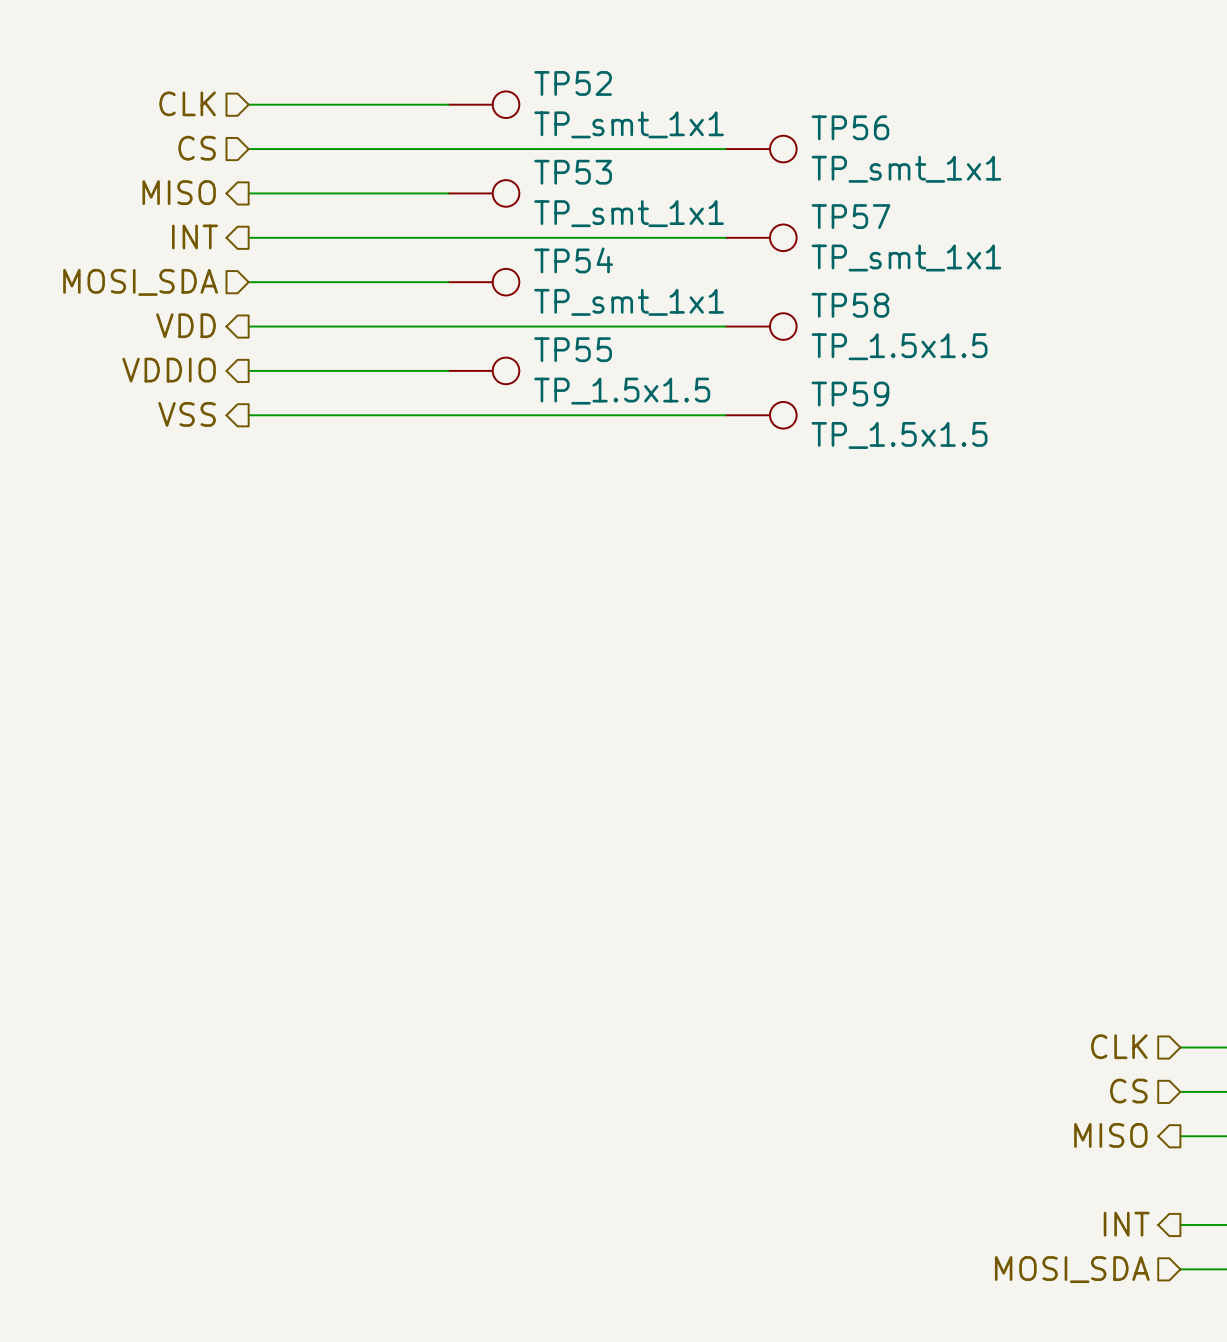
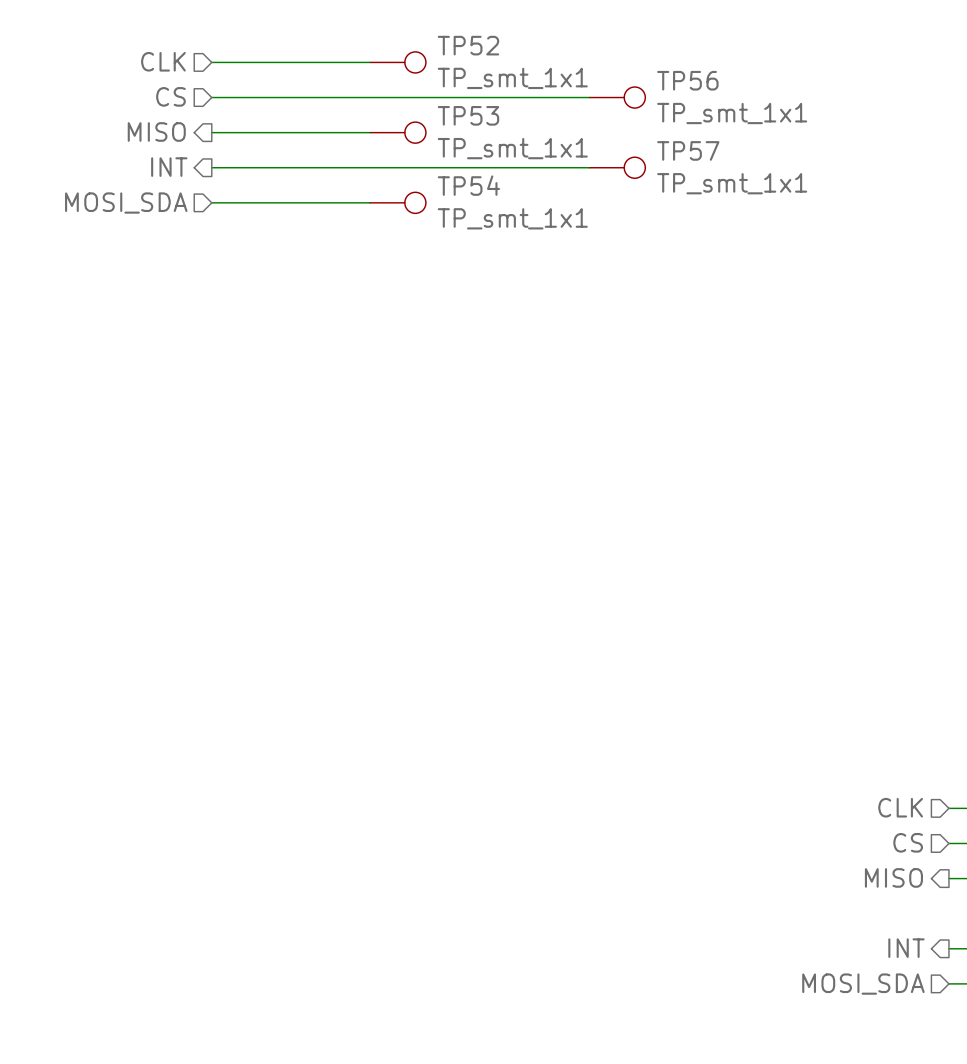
hierarchical label: VDD (186, 325) -> none
wire: (248, 326) (725, 326) -> none
TP58: TP_1.5x1.5 (761, 326) -> none
hierarchical label: VDDIO (169, 370) -> none
wire: (248, 370) (448, 370) -> none
TP55: TP_1.5x1.5 (483, 370) -> none
hierarchical label: VSS (187, 414) -> none
wire: (248, 415) (725, 415) -> none
TP59: TP_1.5x1.5 (761, 415) -> none

